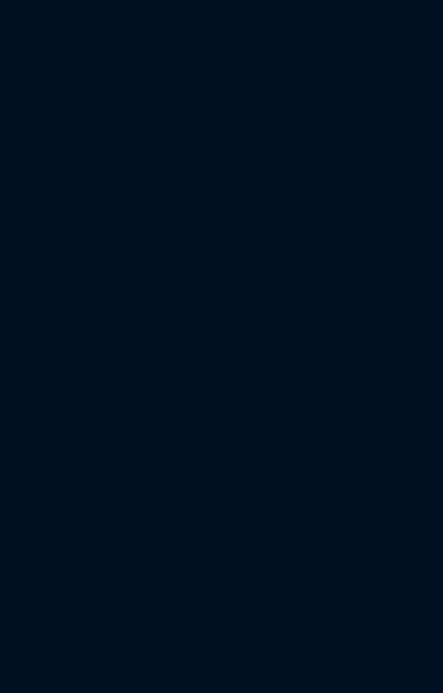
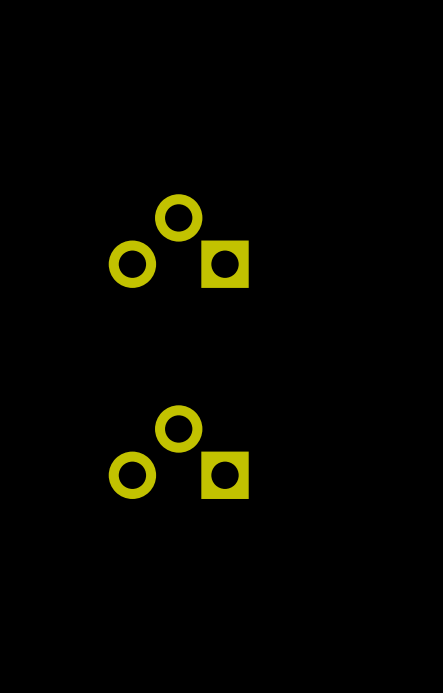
part: none -> (178, 241)
part: none -> (178, 452)

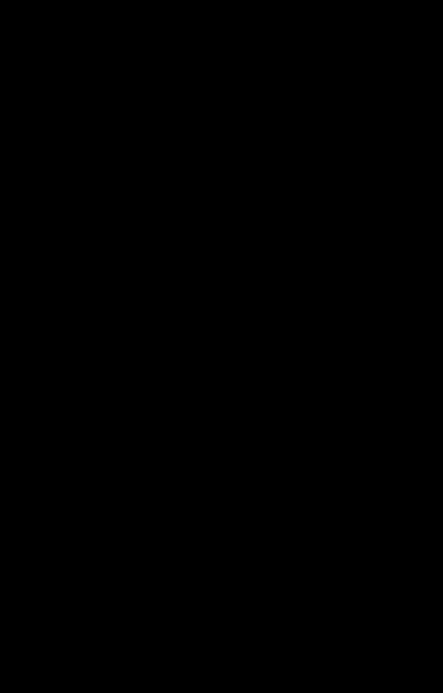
part: (178, 241) -> none
part: (178, 452) -> none

